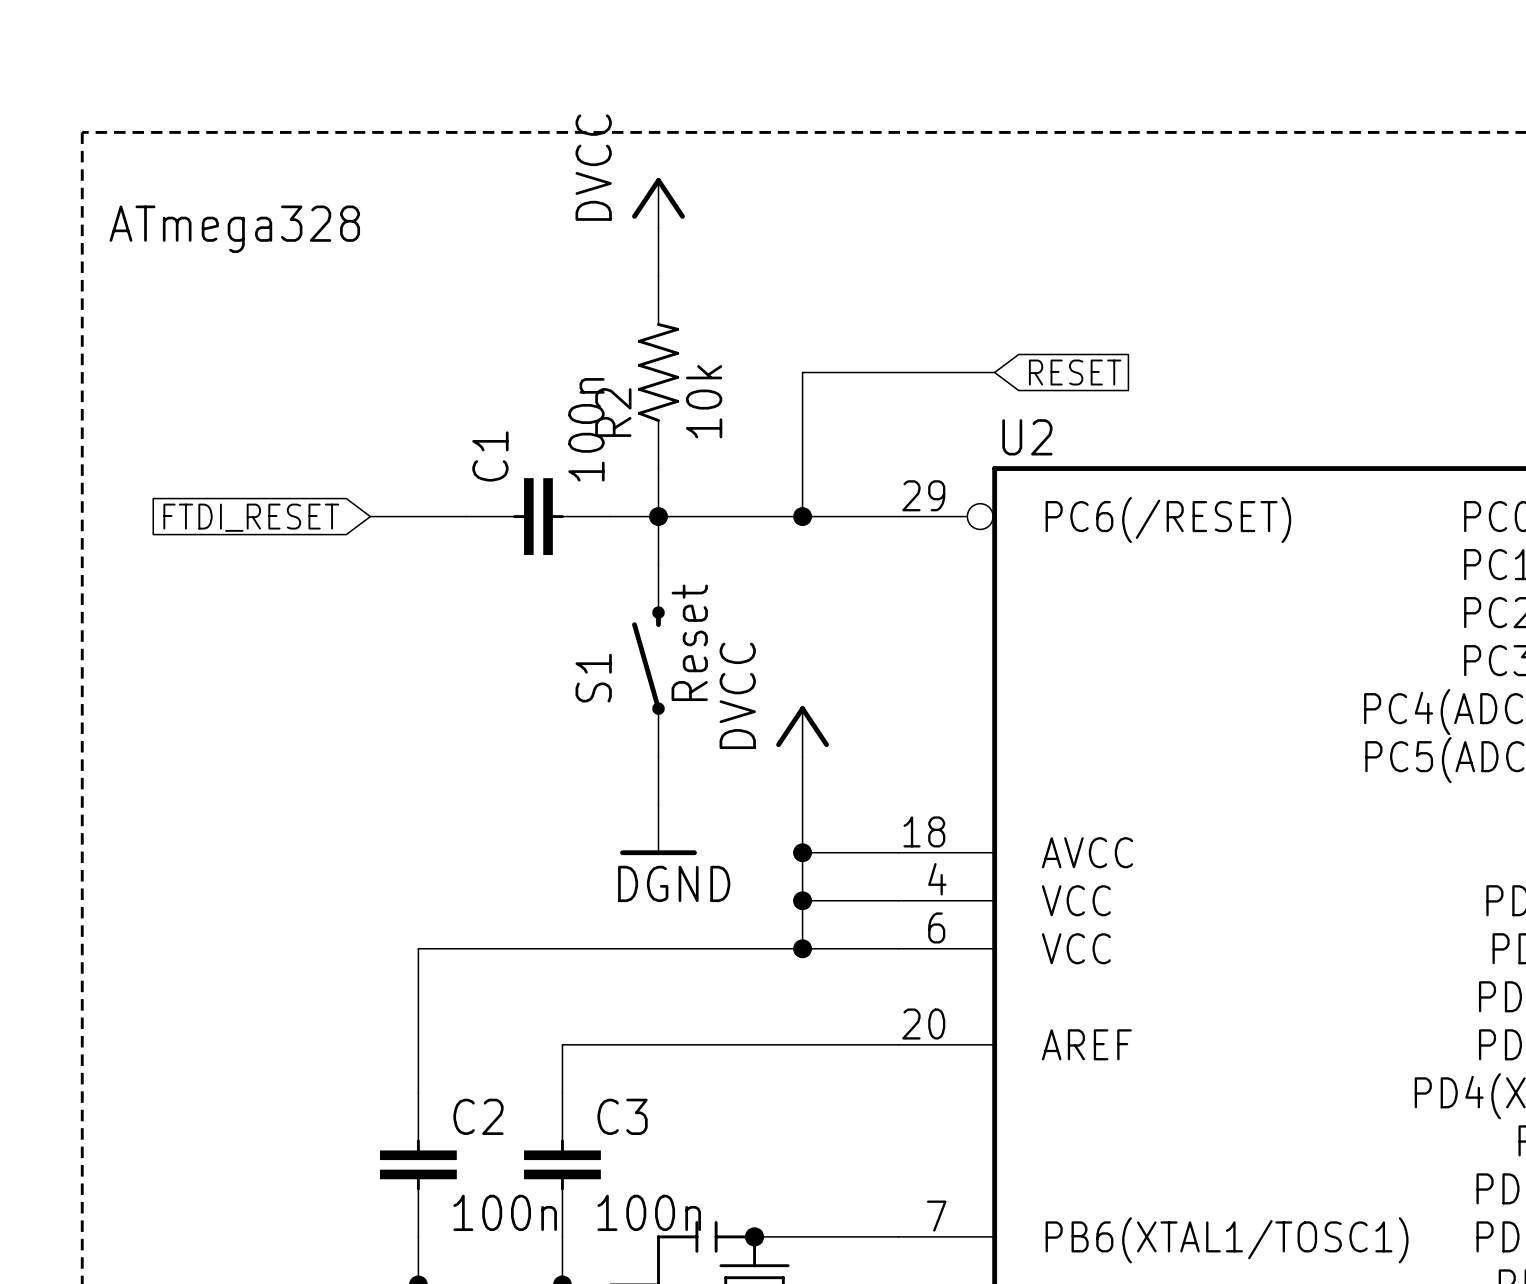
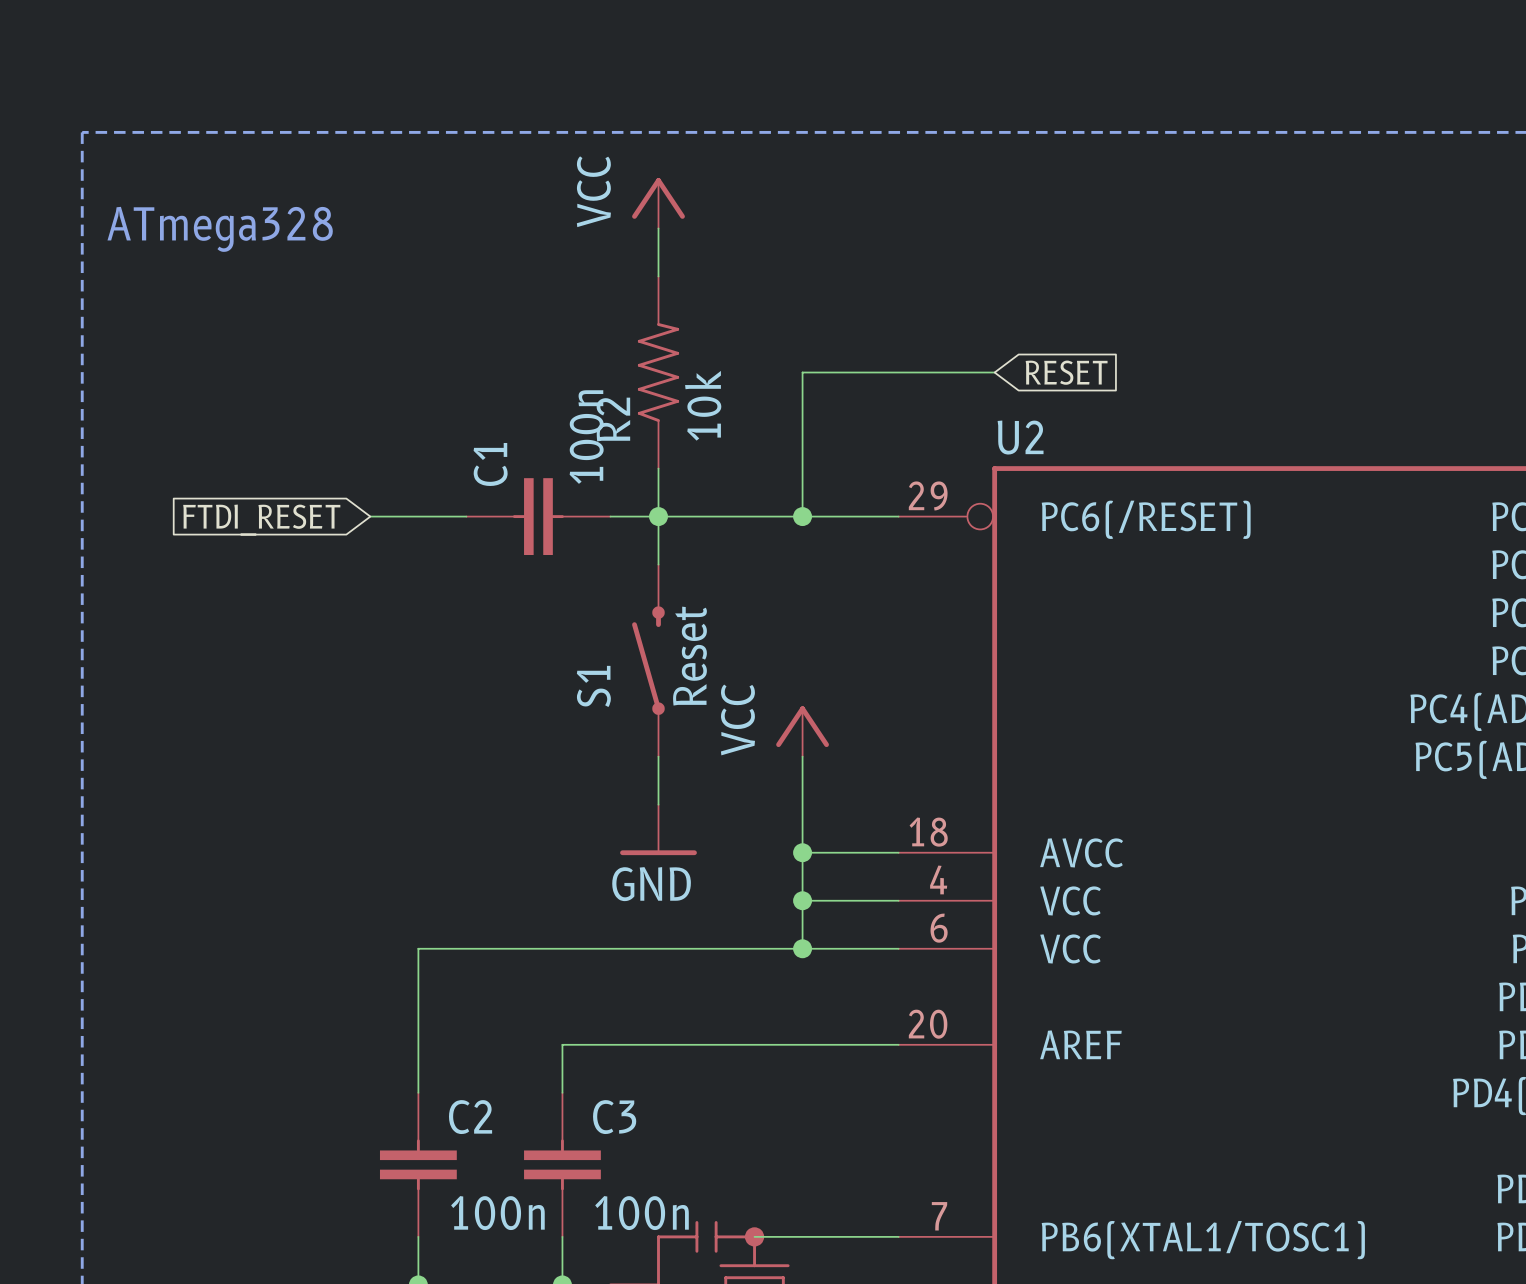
power symbol: DVCC (658, 203) -> VCC (658, 203)
power symbol: DVCC (802, 731) -> VCC (802, 731)
power symbol: DGND (658, 829) -> GND (658, 829)

